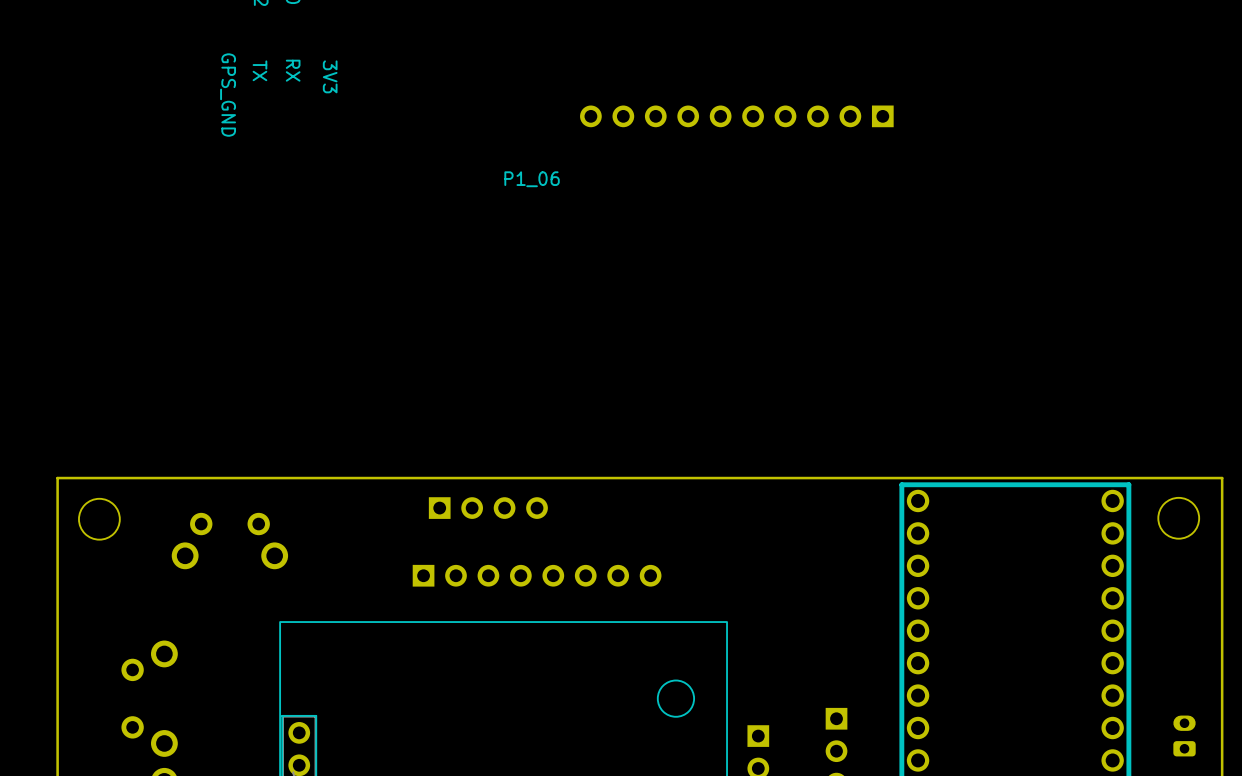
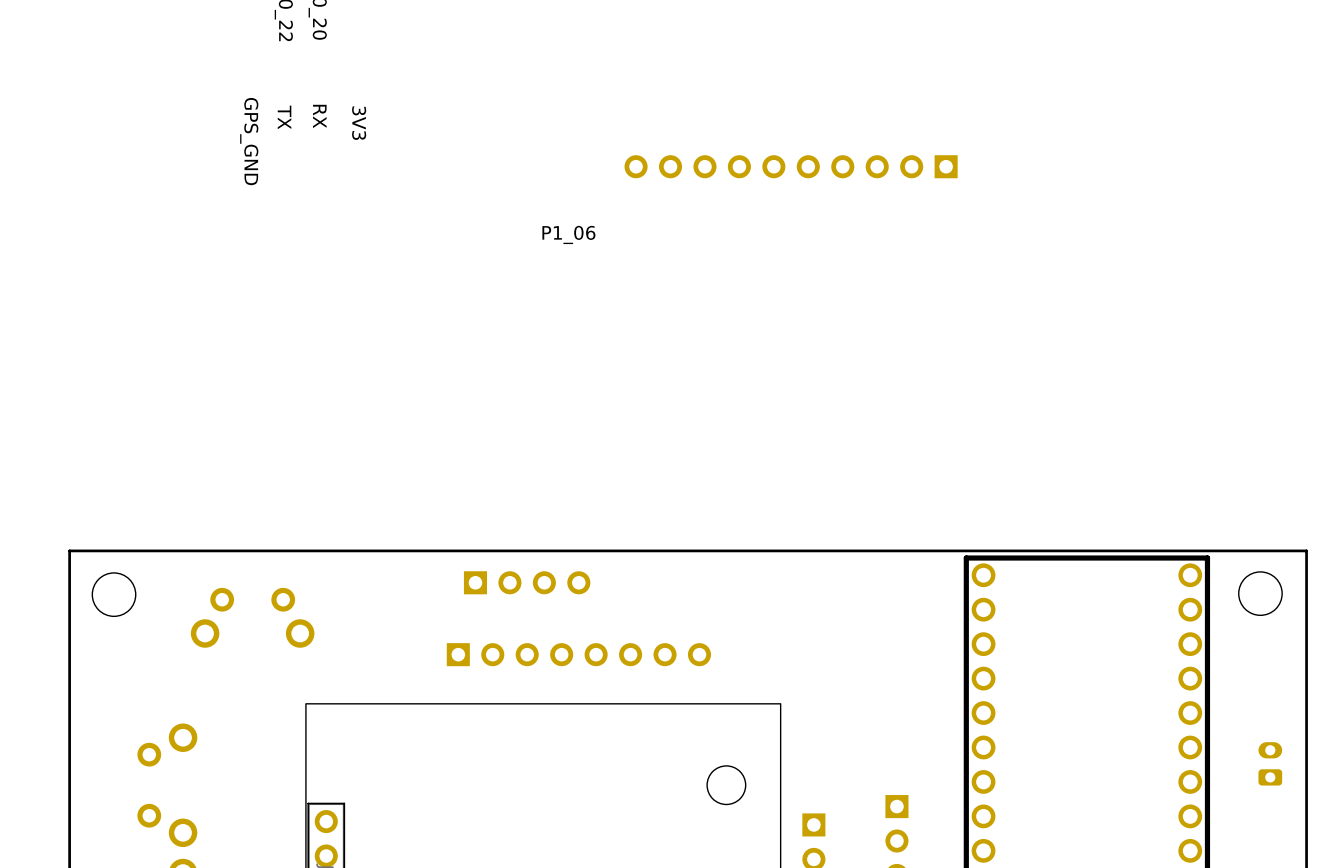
part position: (1184, 735) -> (1270, 763)

